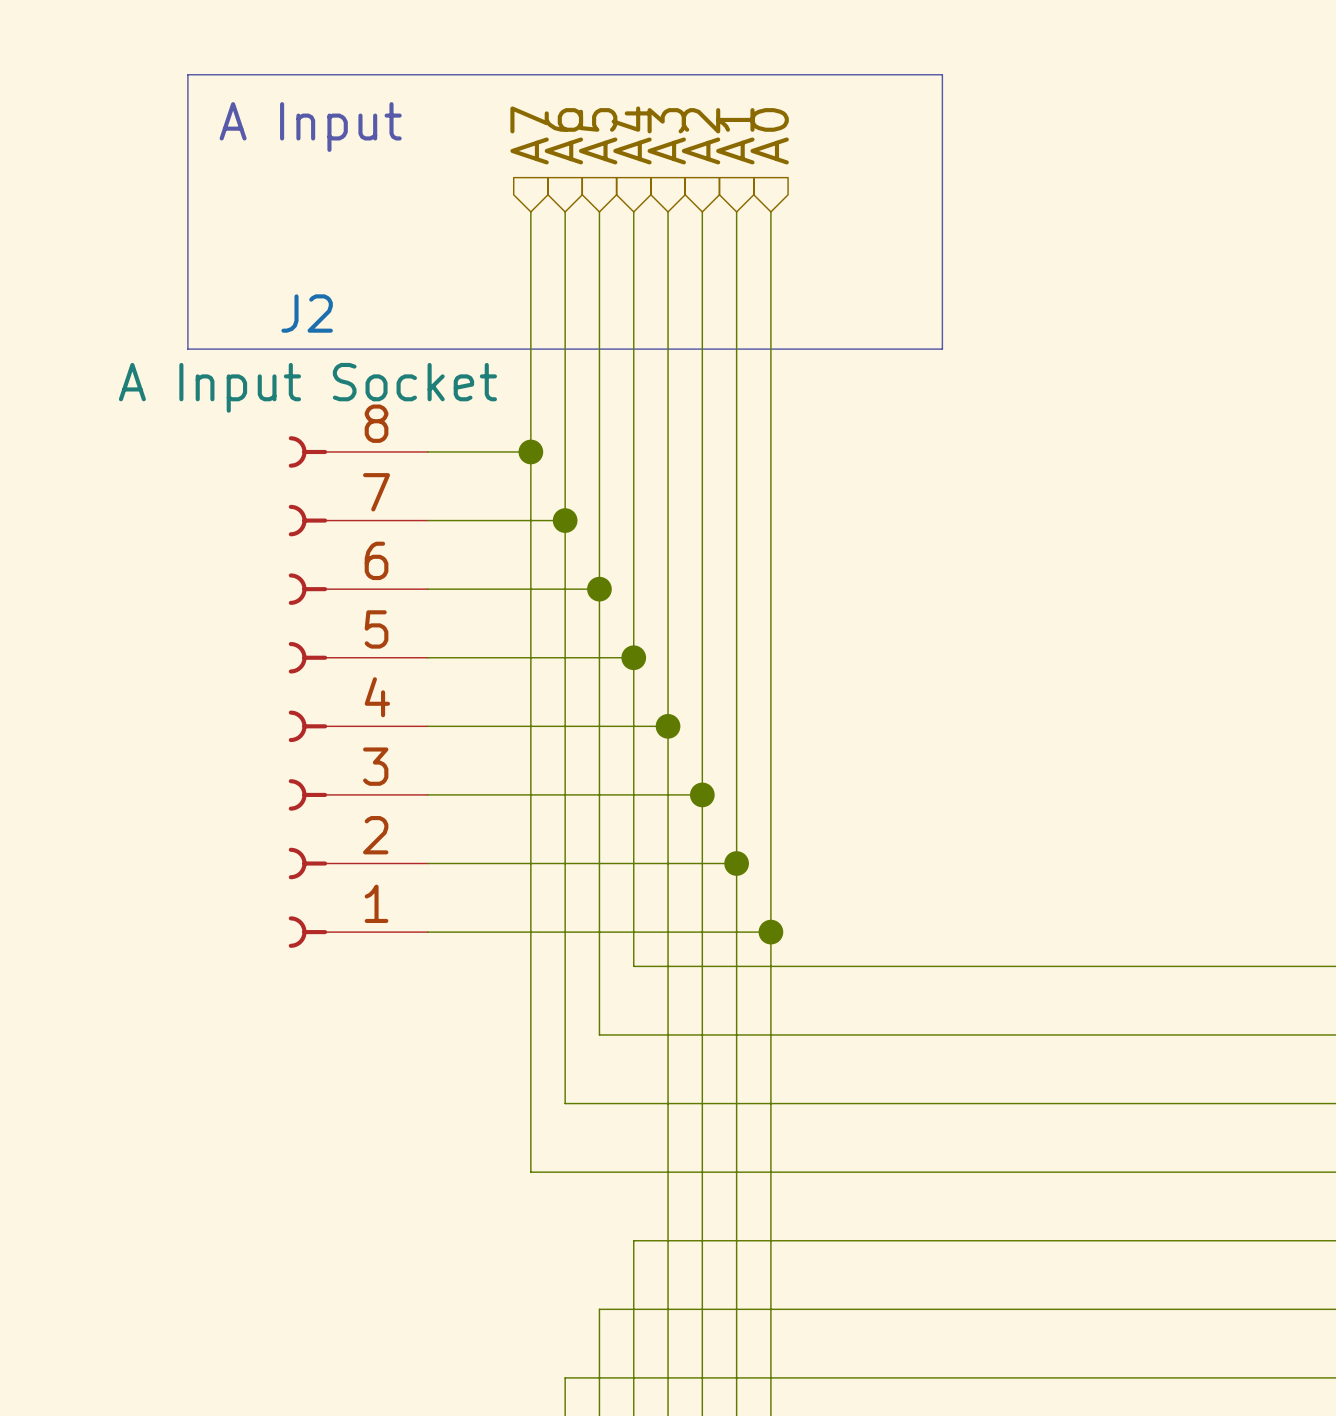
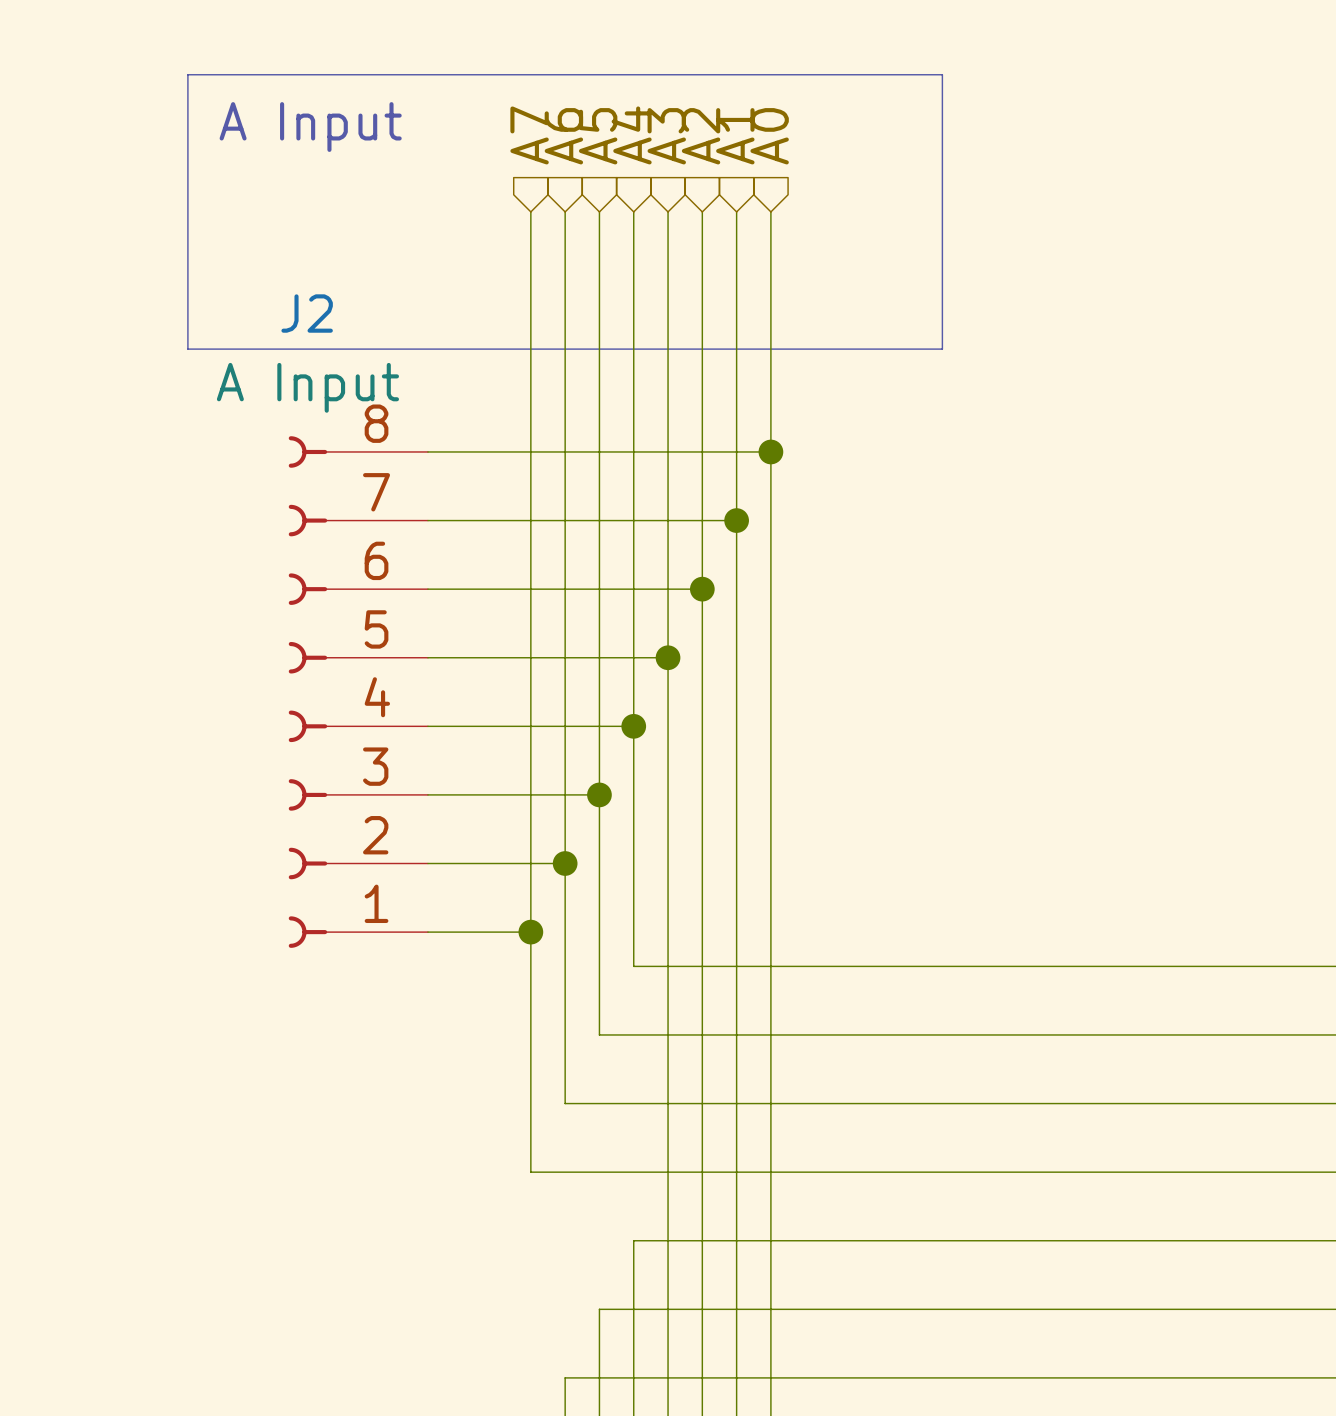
J2 value: A Input Socket (307, 387) -> A Input (307, 387)
junction: (530, 451) -> none
junction: none -> (770, 451)
junction: (565, 520) -> none
junction: none -> (736, 520)
junction: (599, 589) -> none
junction: none -> (702, 589)
junction: (633, 657) -> none
junction: none -> (668, 657)
wire: (633, 726) (668, 726) -> (633, 657) (668, 657)
junction: none -> (633, 726)
junction: (668, 726) -> none
wire: (599, 794) (702, 794) -> (599, 589) (702, 589)
junction: none -> (599, 794)
junction: (702, 794) -> none
wire: (565, 863) (736, 863) -> (565, 520) (736, 520)
junction: none -> (565, 863)
junction: (736, 863) -> none
wire: (530, 932) (770, 932) -> (530, 451) (770, 451)
junction: none -> (530, 932)
junction: (770, 932) -> none

